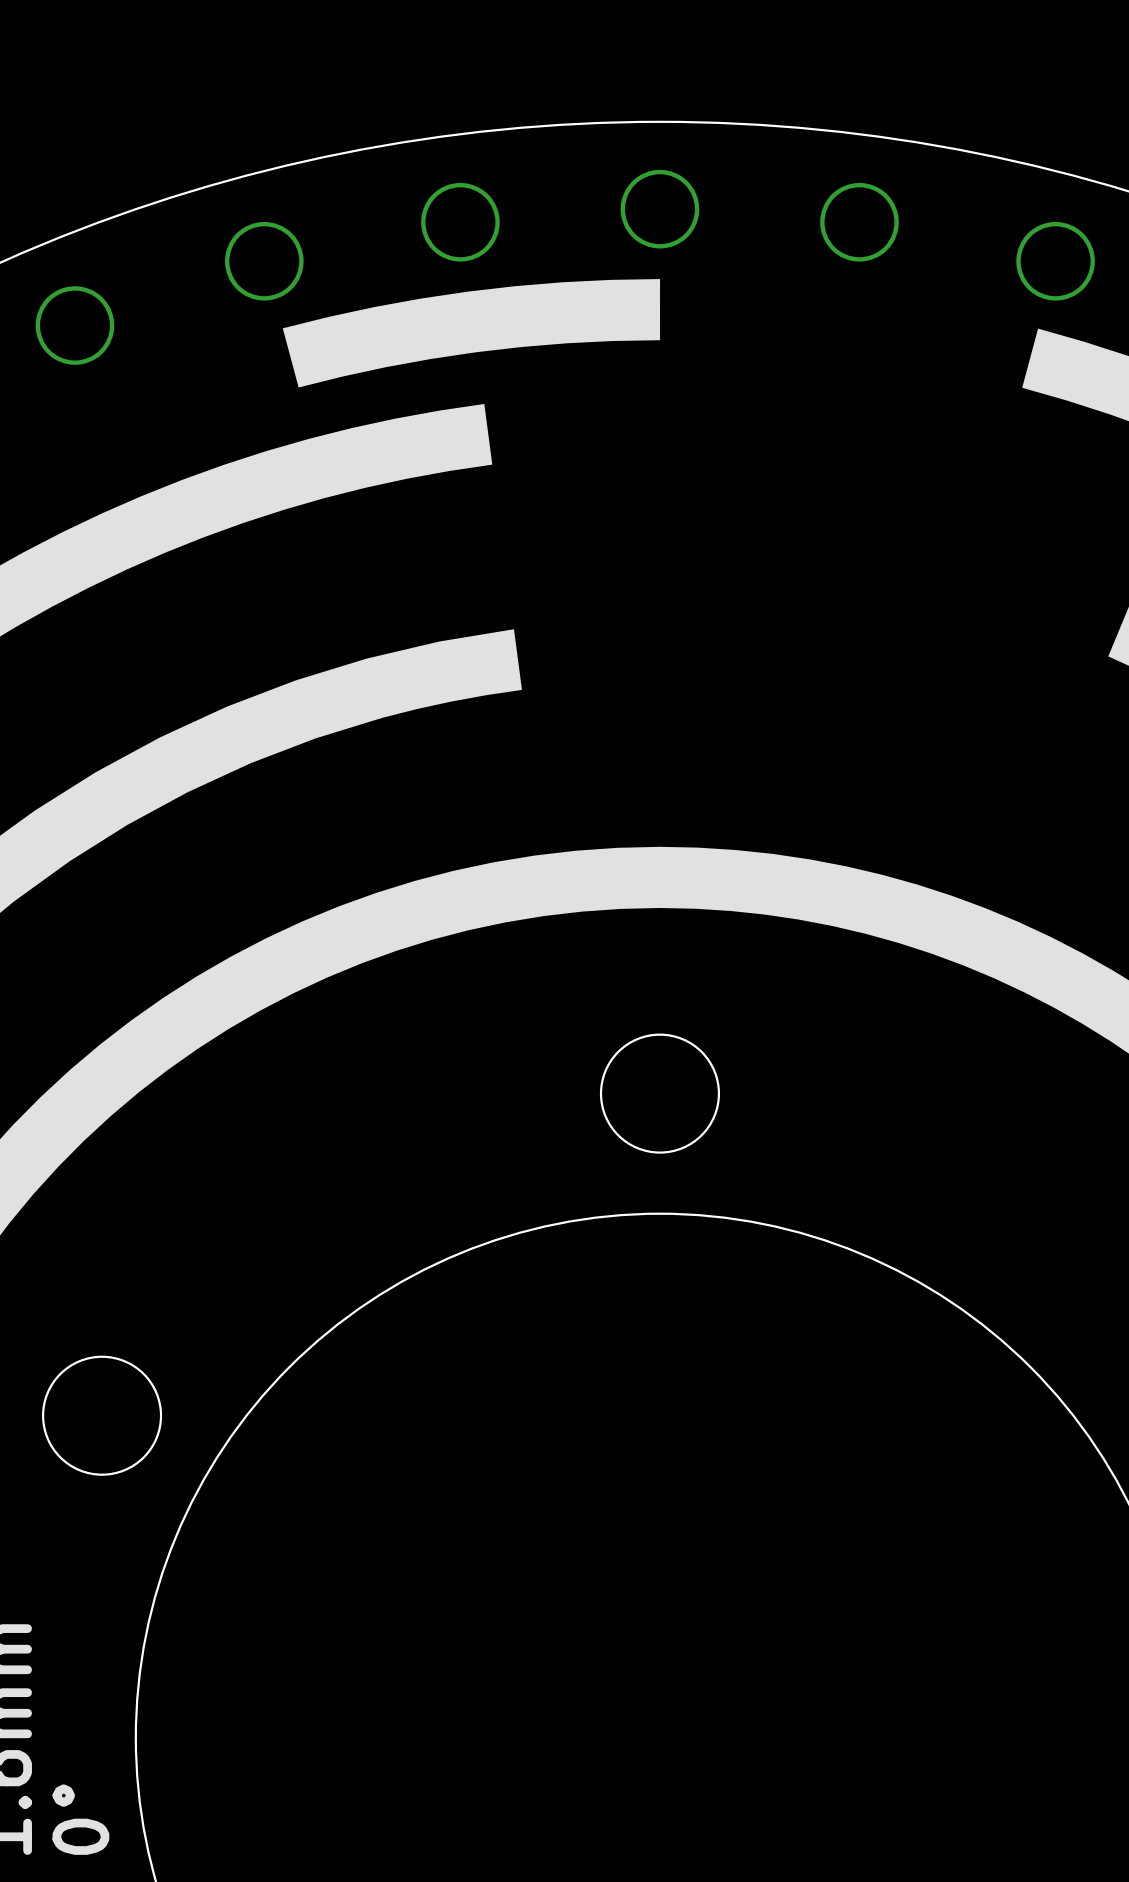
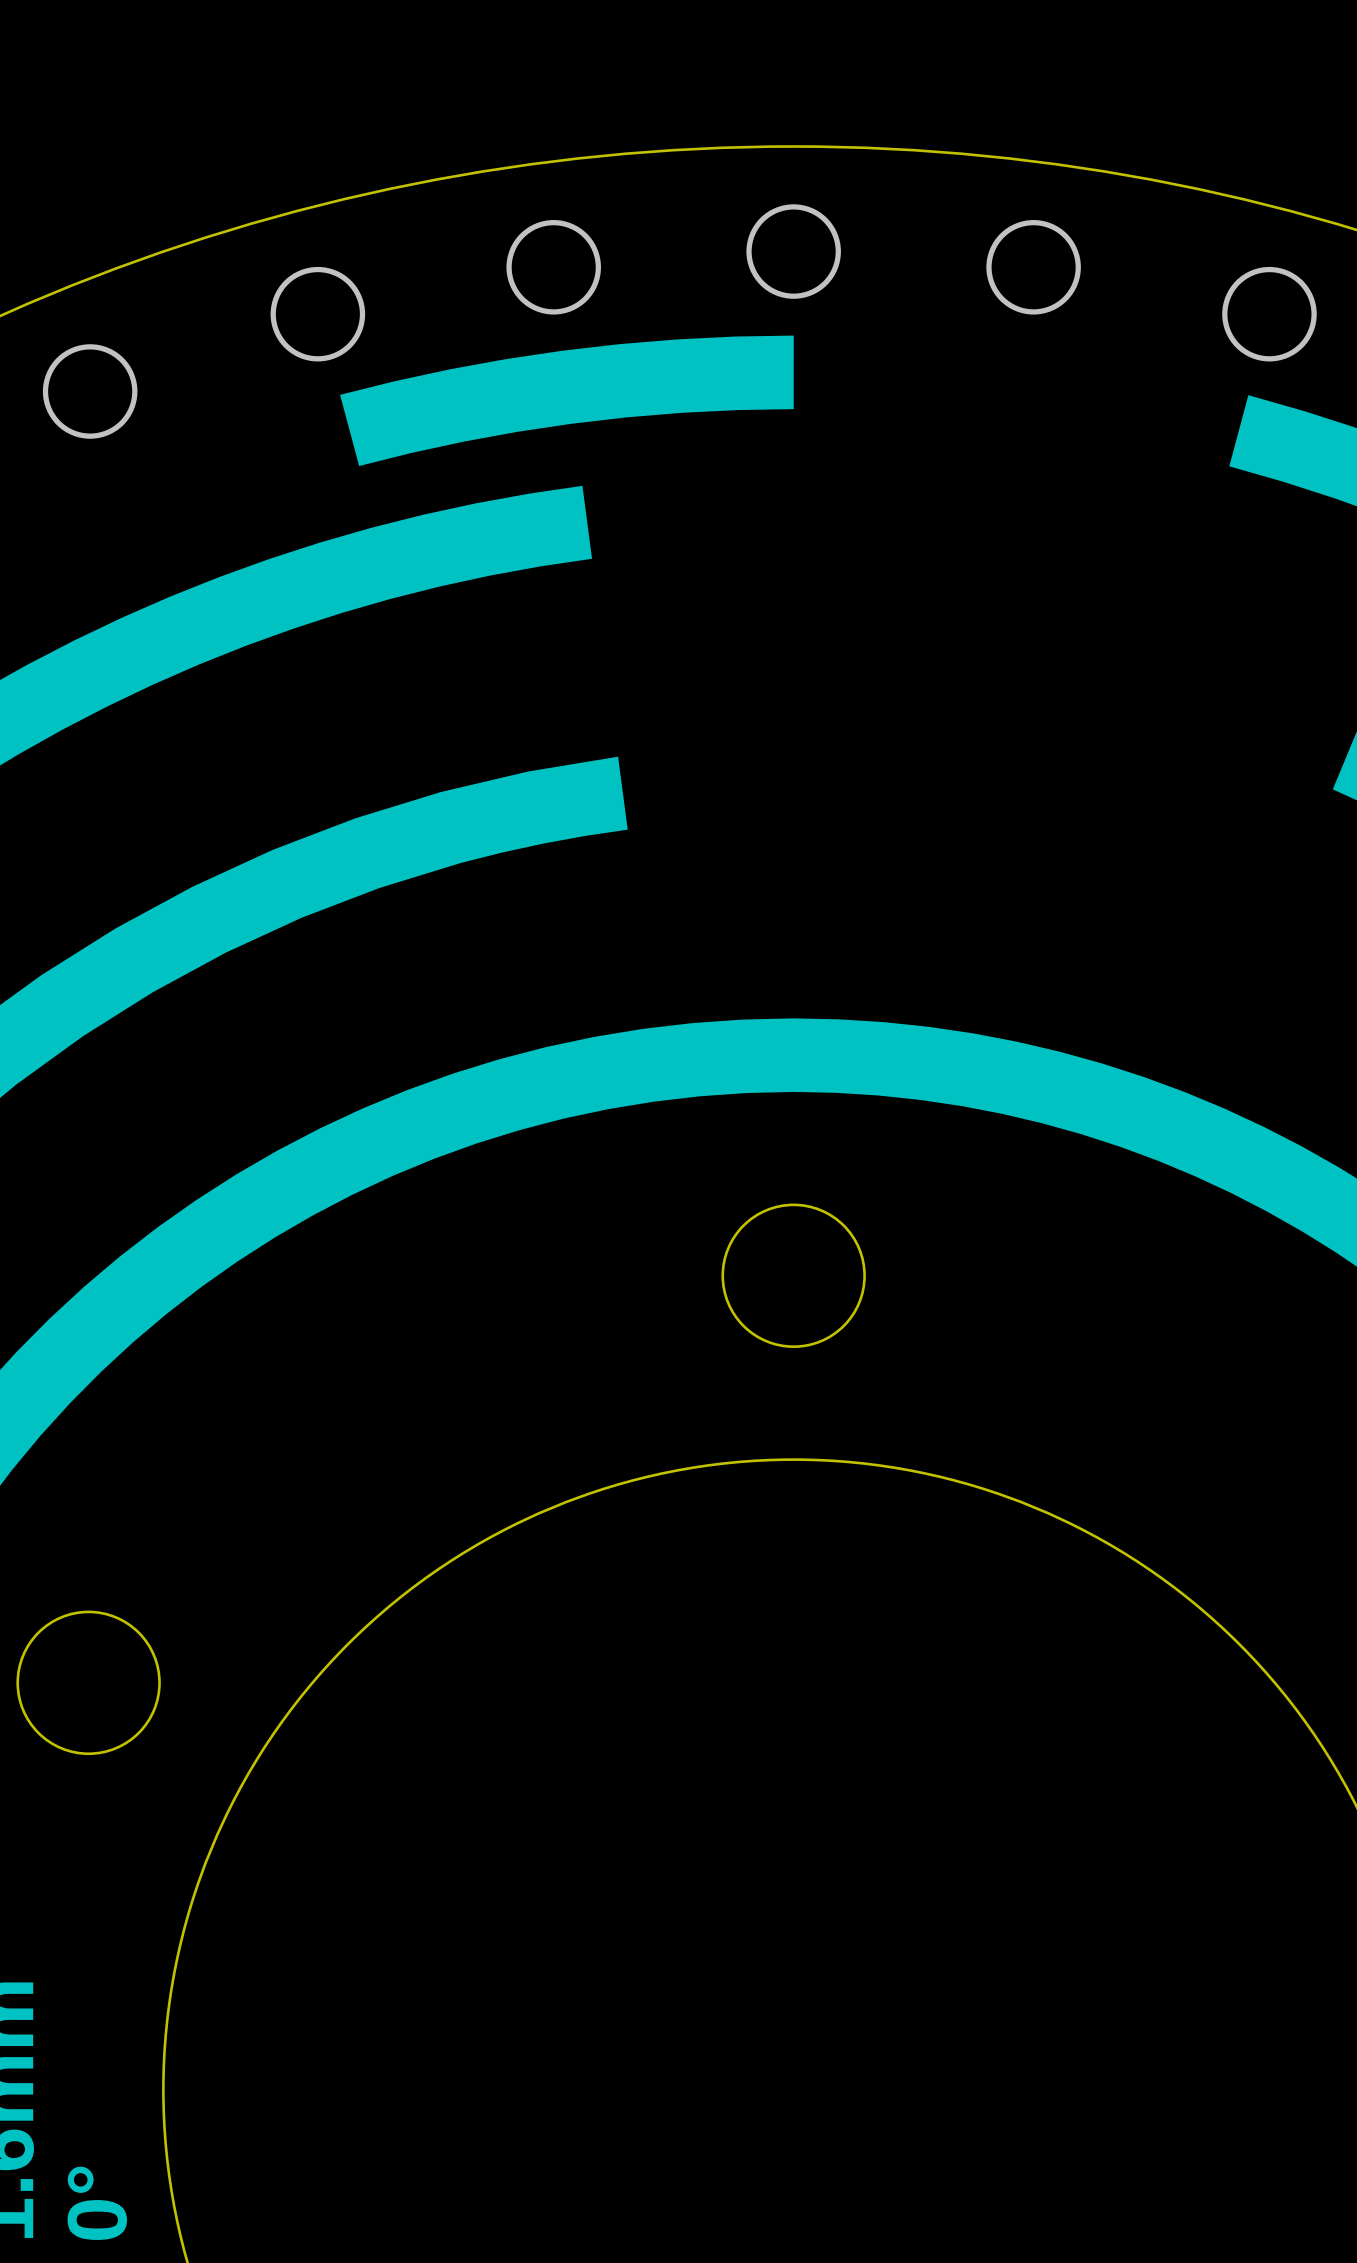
round board edge position: (659, 1093) -> (793, 1275)
round board edge position: (102, 1415) -> (88, 1682)

